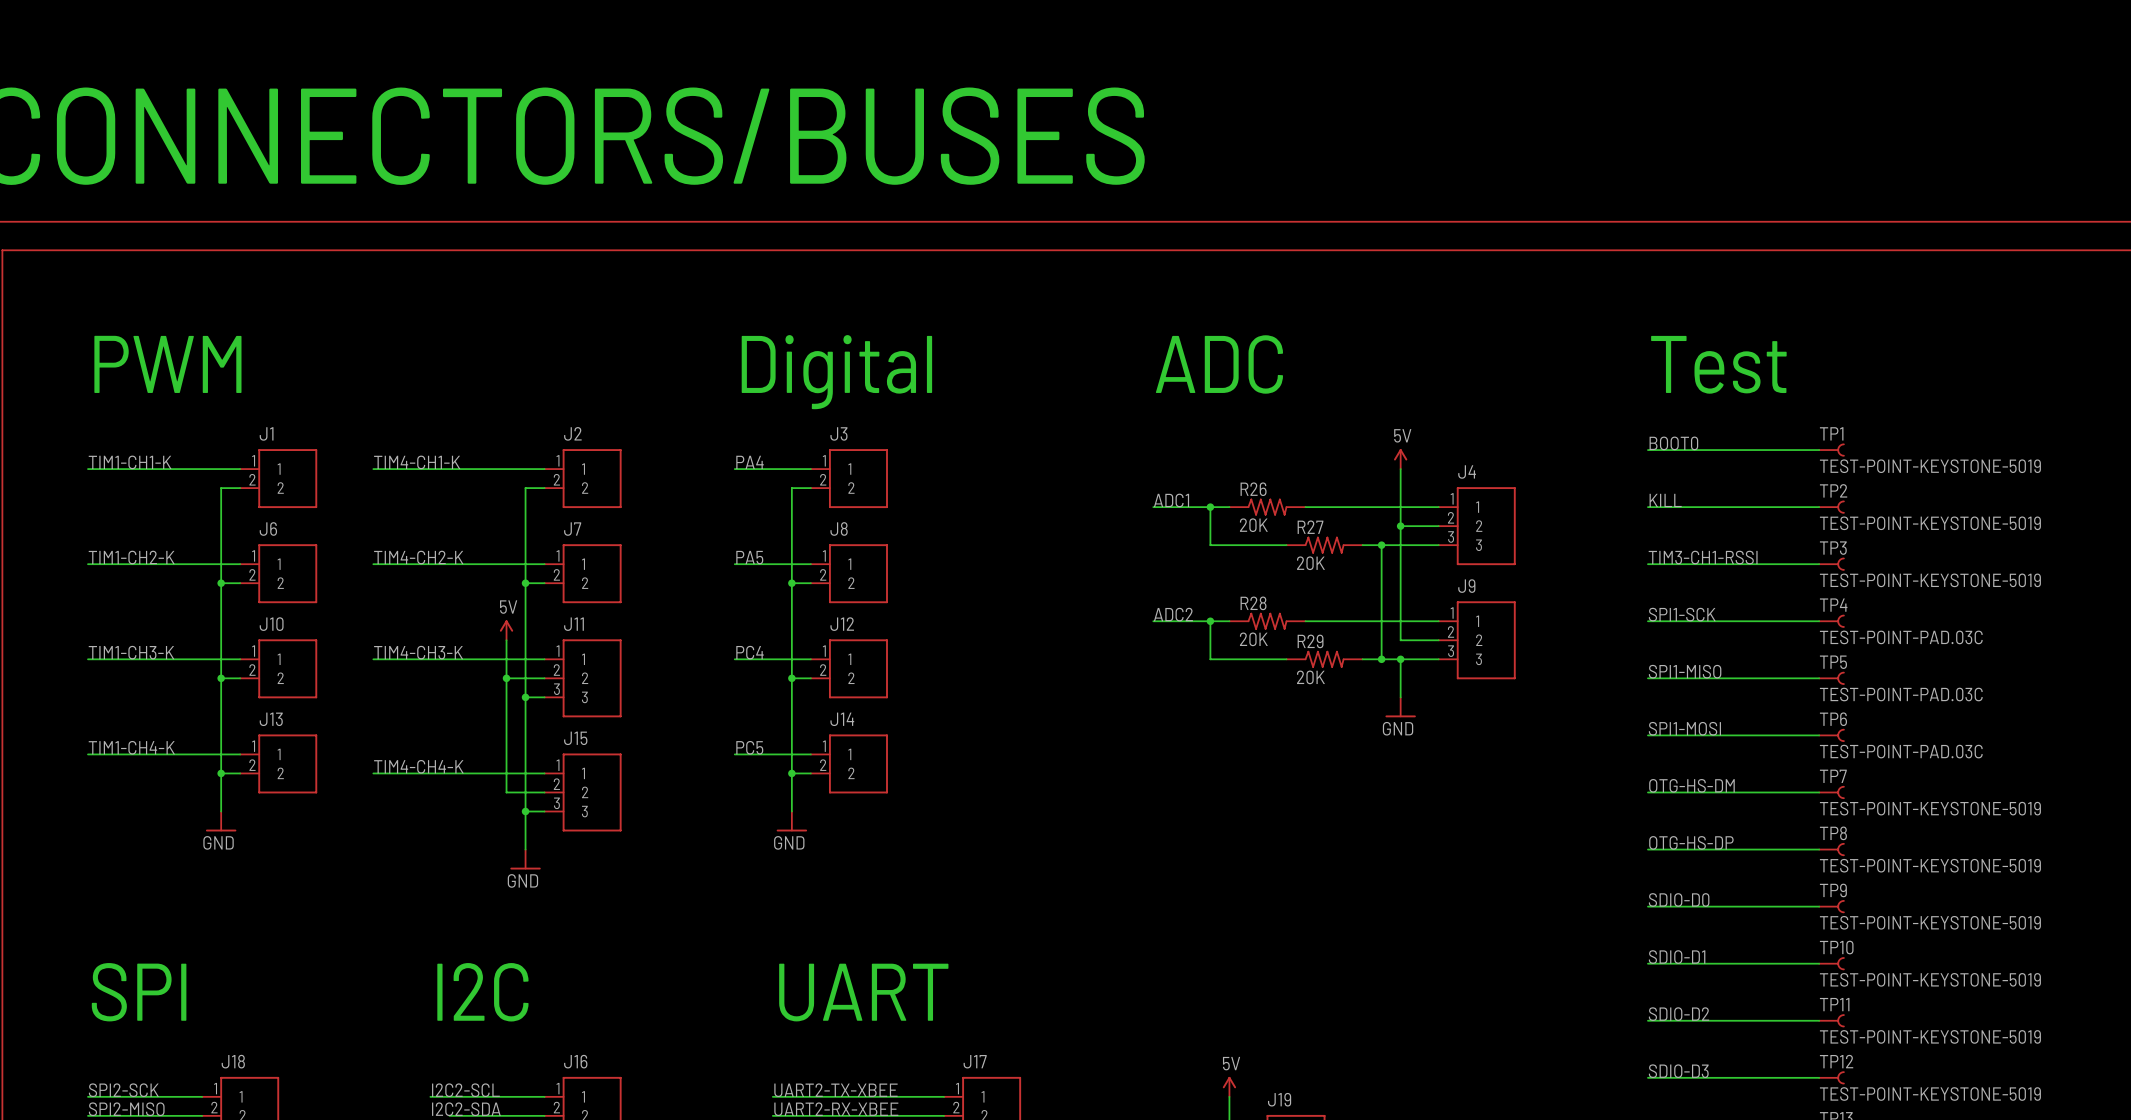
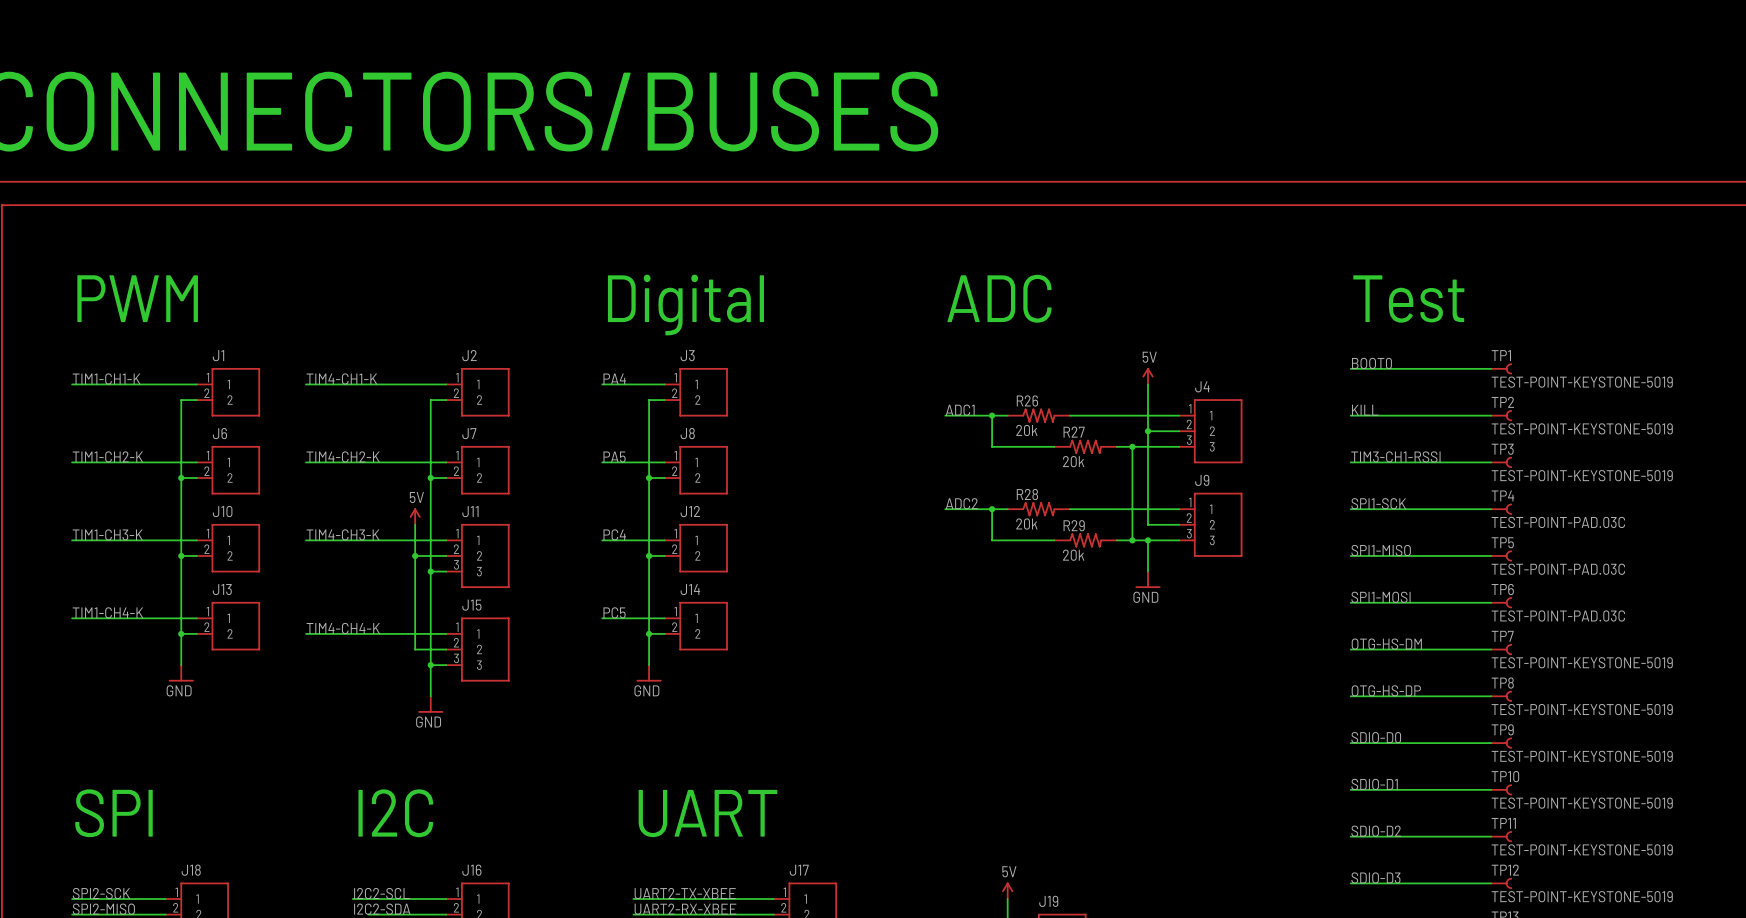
R26 value: 20K (1253, 525) -> 20k (1026, 430)
R27 value: 20K (1310, 563) -> 20k (1073, 461)
R28 value: 20K (1253, 639) -> 20k (1026, 524)
R29 value: 20K (1310, 677) -> 20k (1073, 555)

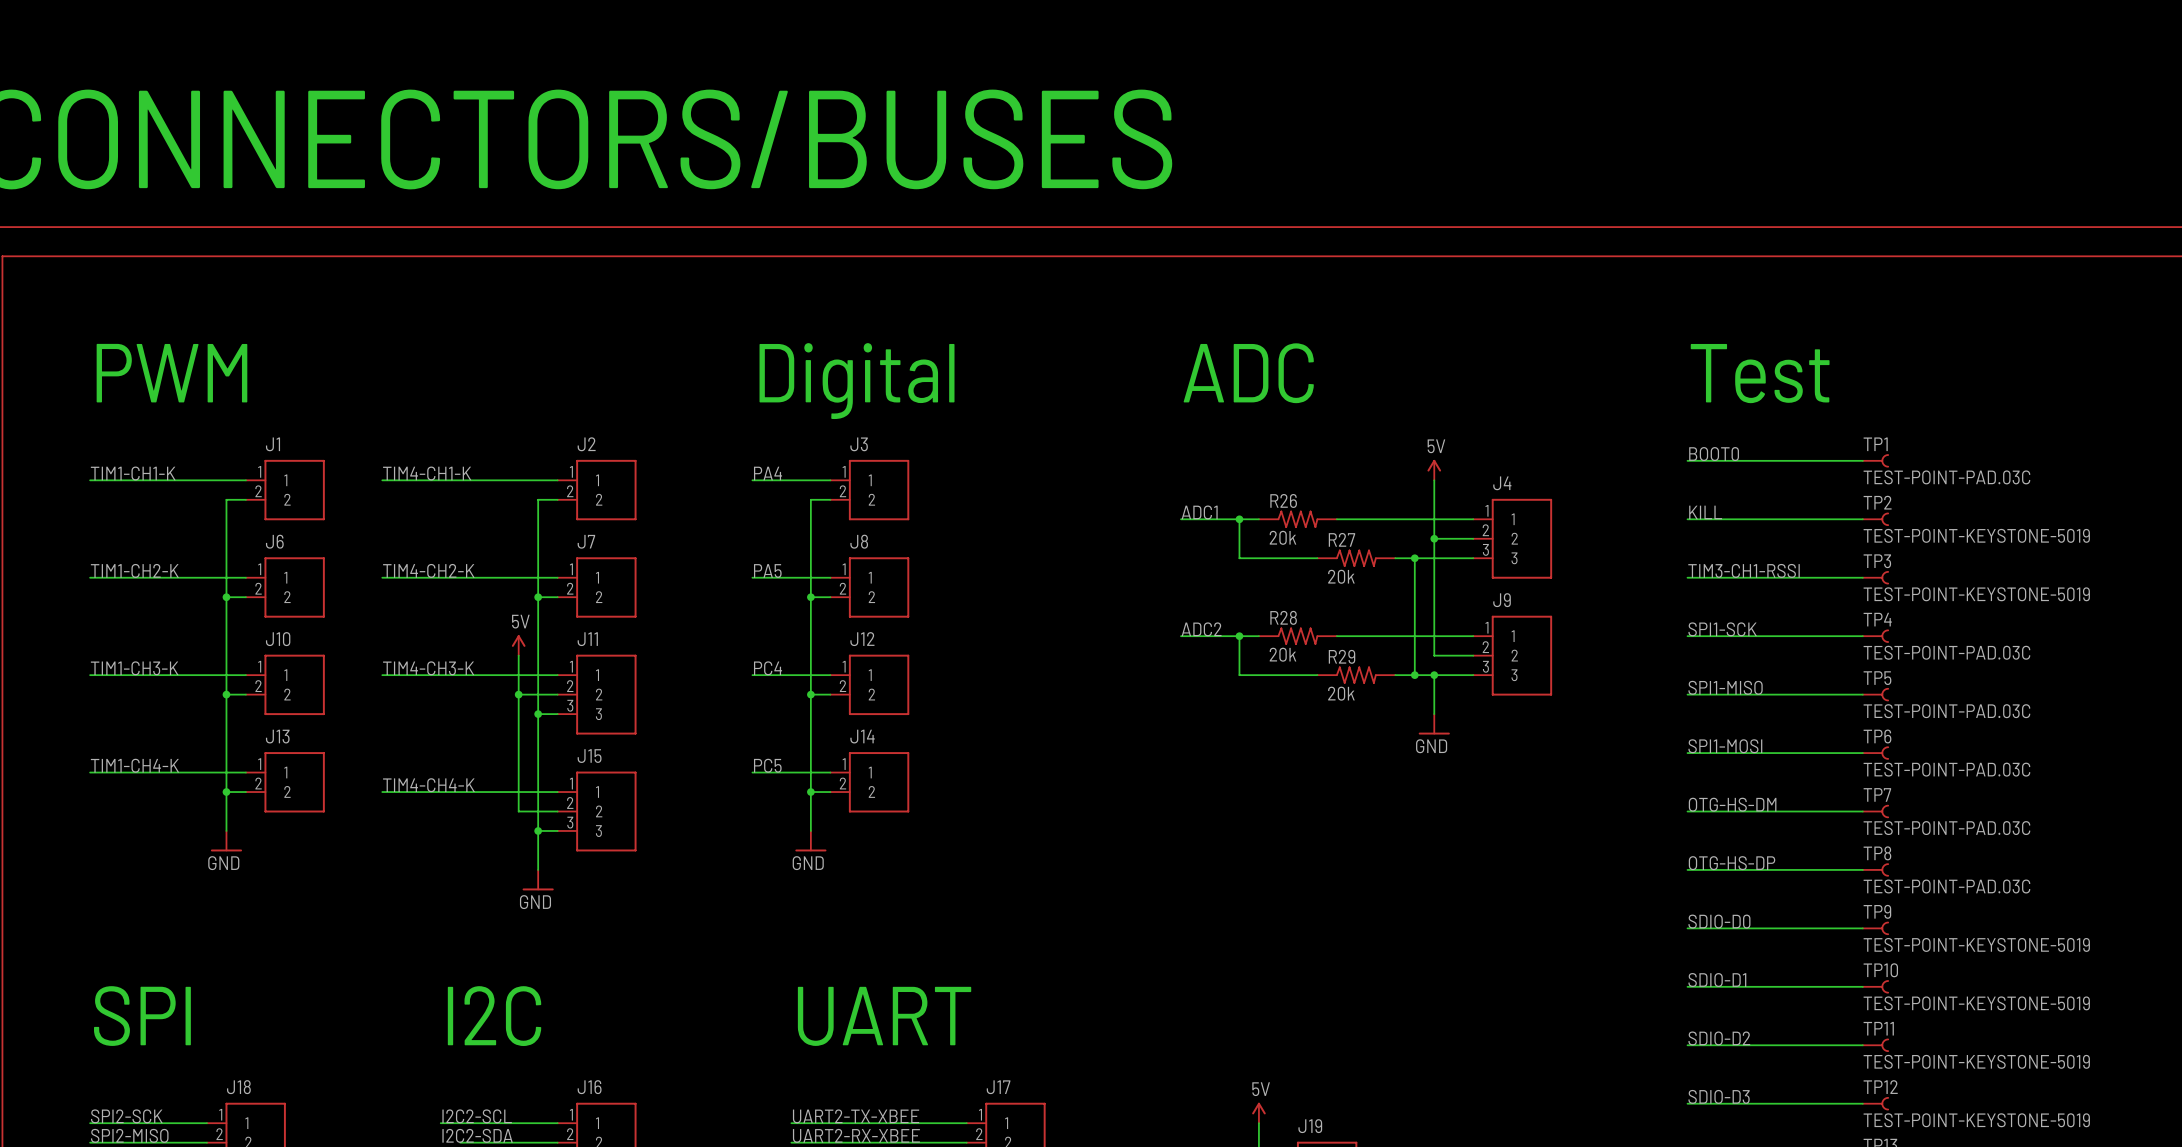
TP1 value: TEST-POINT-KEYSTONE-5019 (1582, 382) -> TEST-POINT-PAD.03C (1946, 477)
TP7 value: TEST-POINT-KEYSTONE-5019 (1582, 662) -> TEST-POINT-PAD.03C (1946, 828)
TP8 value: TEST-POINT-KEYSTONE-5019 (1582, 709) -> TEST-POINT-PAD.03C (1946, 886)

